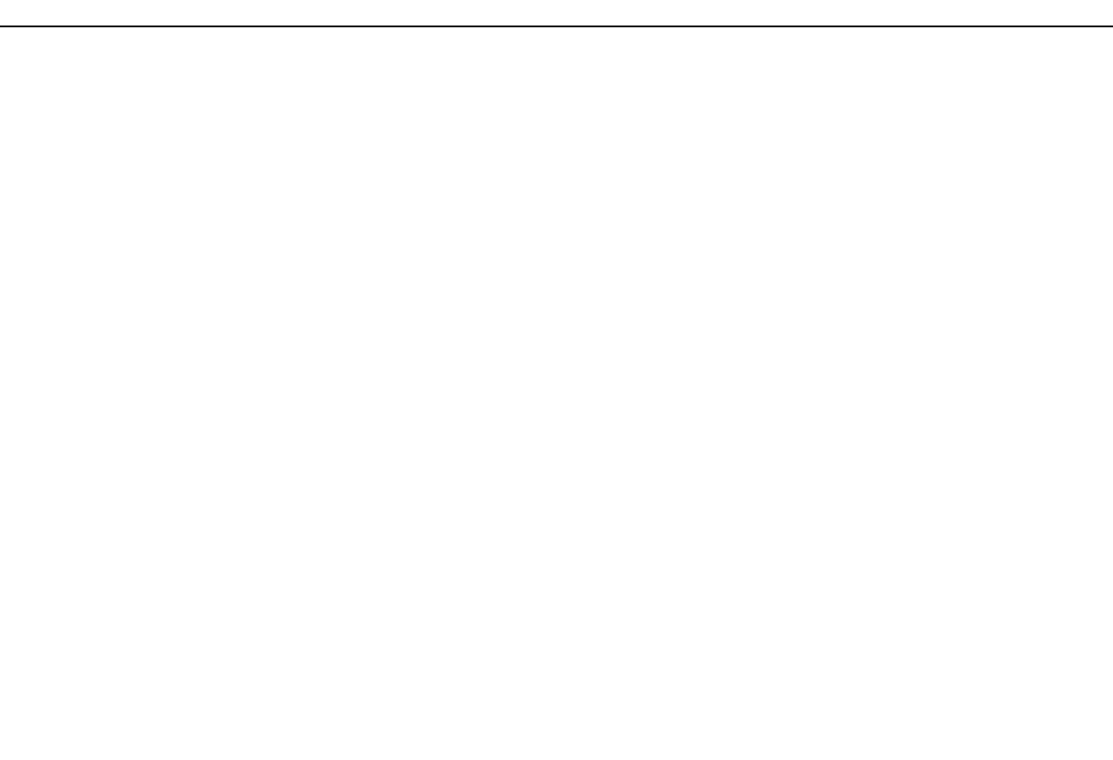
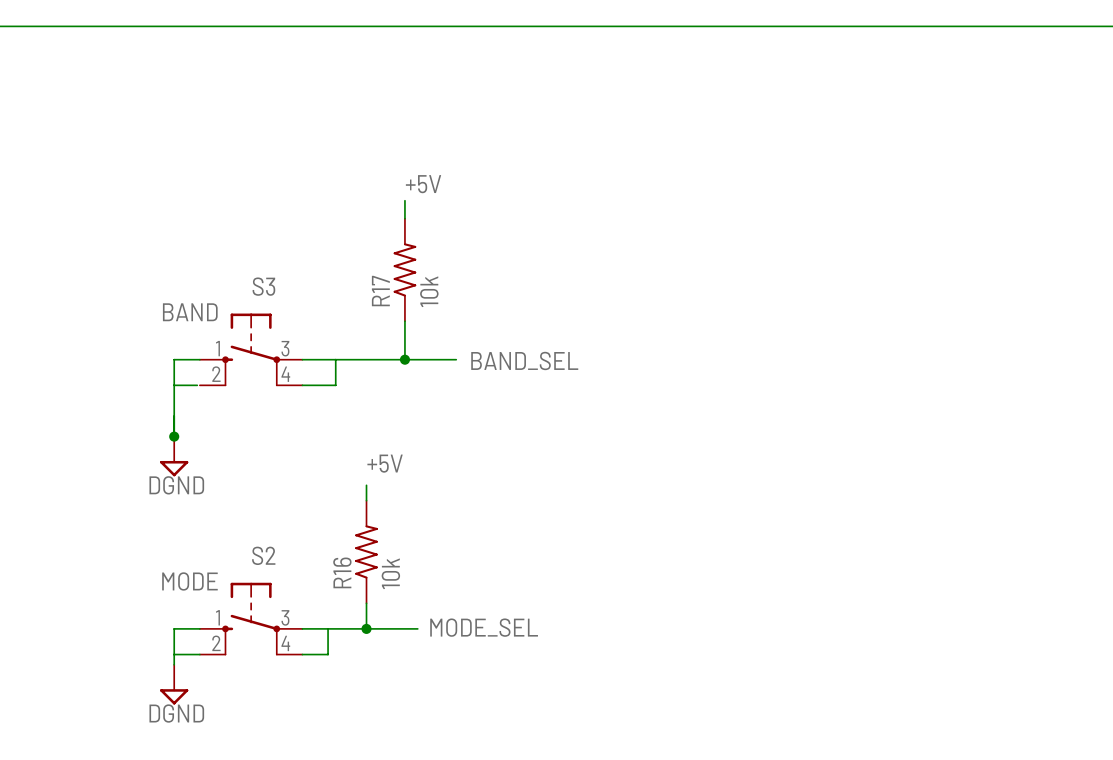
label: none -> +5V (423, 184)
wire: none -> (404, 200) (404, 218)
R17: none -> 10k (404, 269)
wire: none -> (404, 321) (404, 359)
S3: none -> BAND (251, 349)
wire: none -> (199, 359) (174, 359) (174, 436)
wire: none -> (302, 359) (456, 359)
wire: none -> (335, 359) (335, 385) (302, 385)
junction: none -> (404, 359)
label: none -> BAND_SEL (524, 360)
wire: none -> (174, 385) (197, 385)
junction: none -> (174, 436)
power symbol: none -> DGND (174, 456)
label: none -> +5V (385, 463)
wire: none -> (366, 485) (366, 500)
R16: none -> 10k (366, 551)
wire: none -> (366, 603) (366, 628)
S2: none -> MODE (251, 619)
wire: none -> (199, 628) (174, 628) (174, 664)
wire: none -> (302, 628) (417, 628)
wire: none -> (328, 628) (328, 654) (302, 654)
junction: none -> (366, 628)
label: none -> MODE_SEL (484, 627)
wire: none -> (174, 654) (199, 654)
power symbol: none -> DGND (174, 684)

